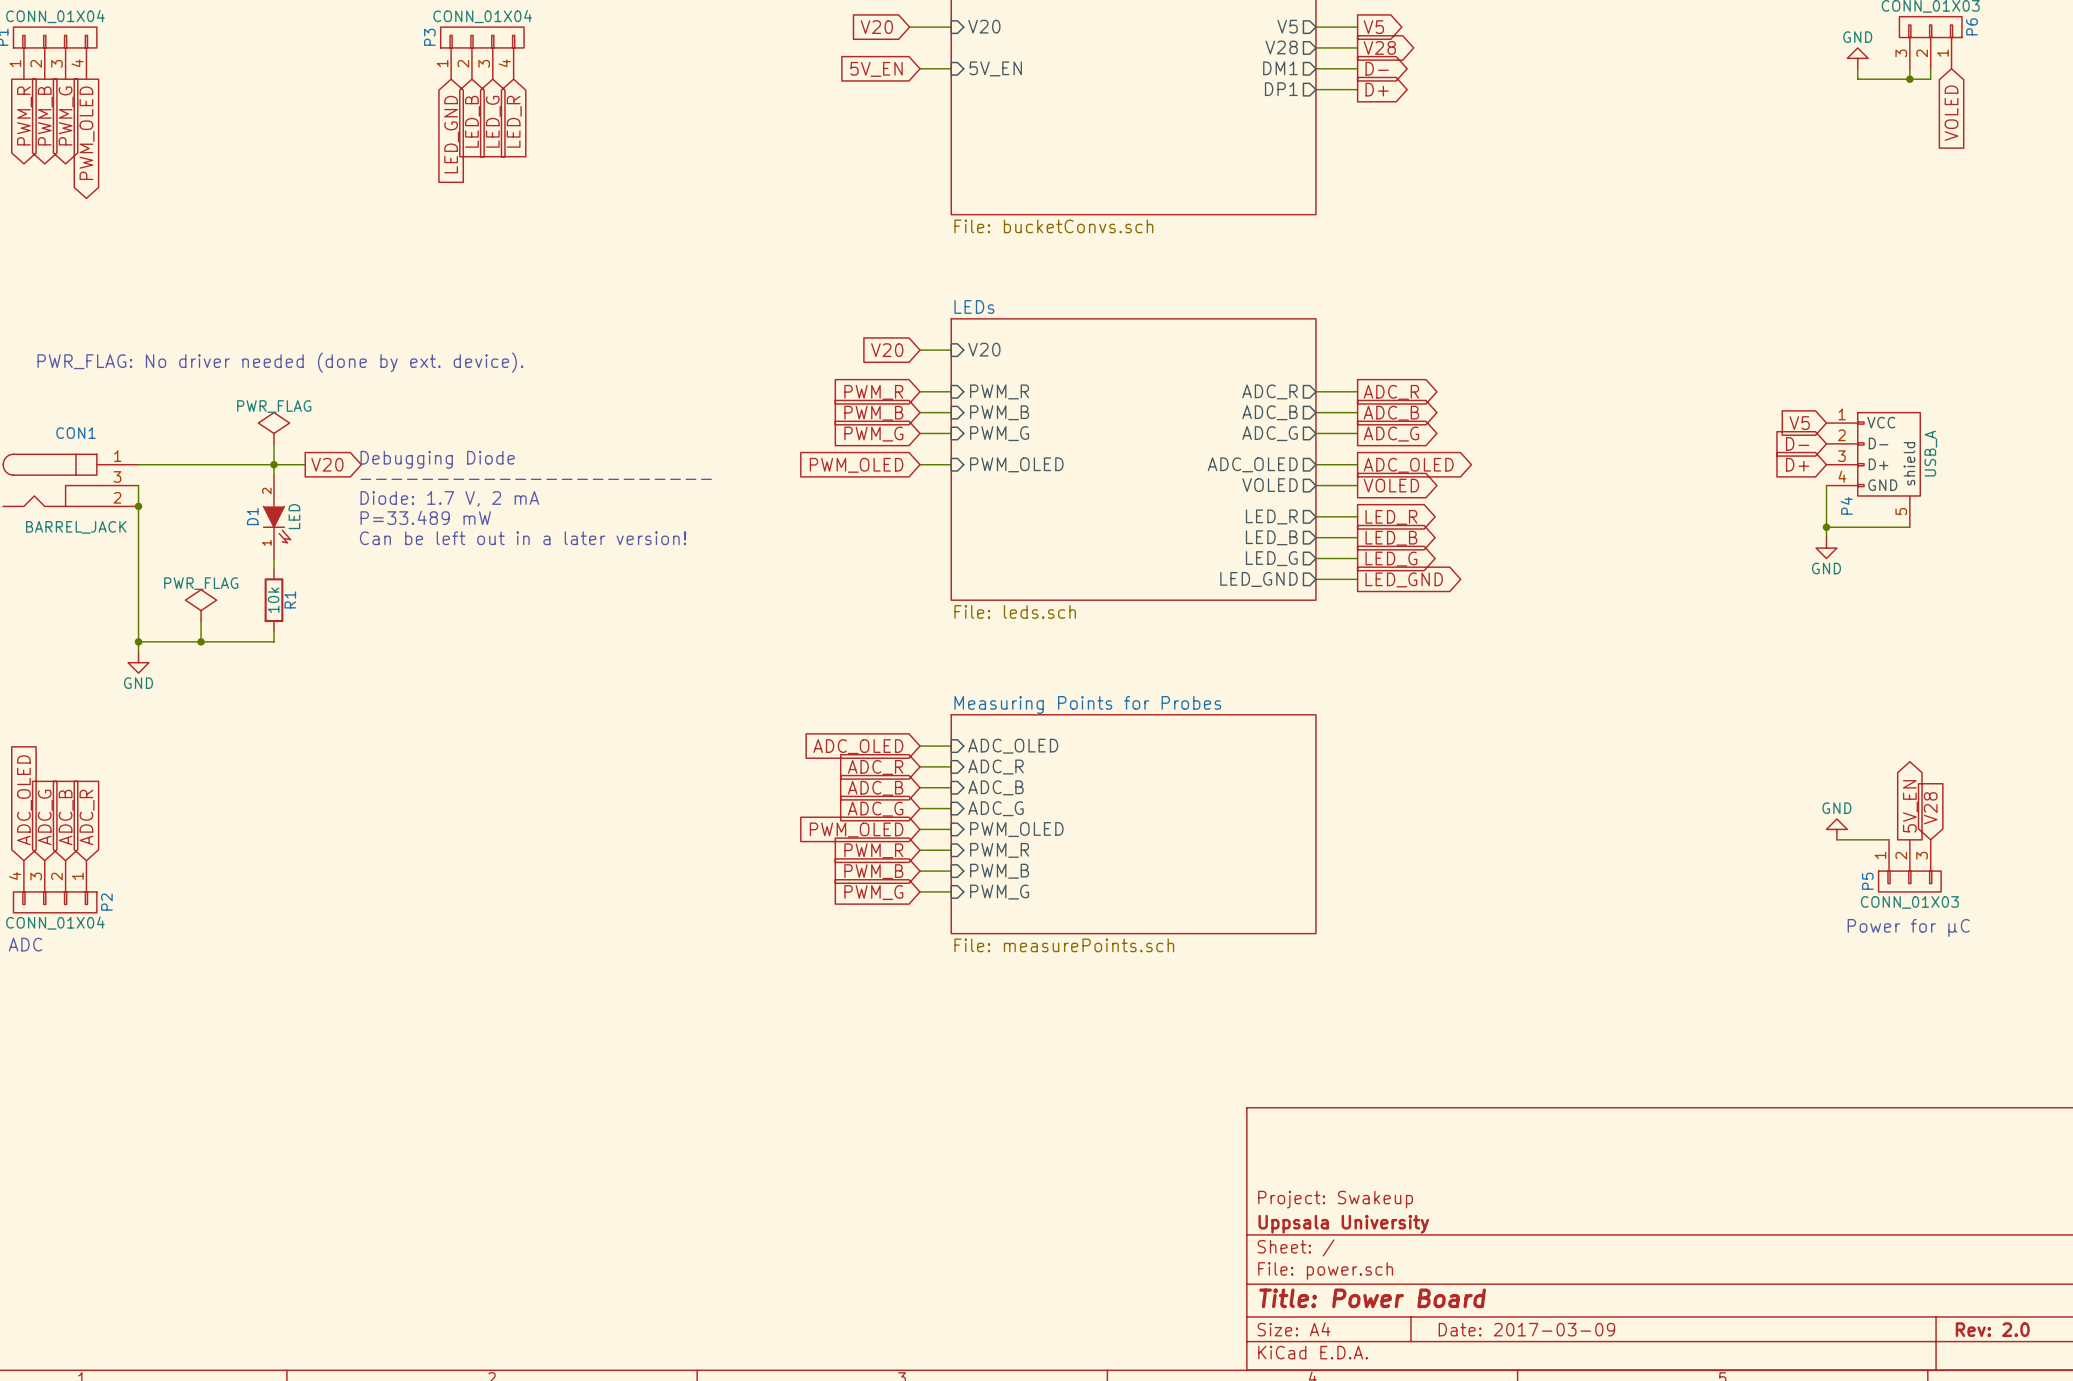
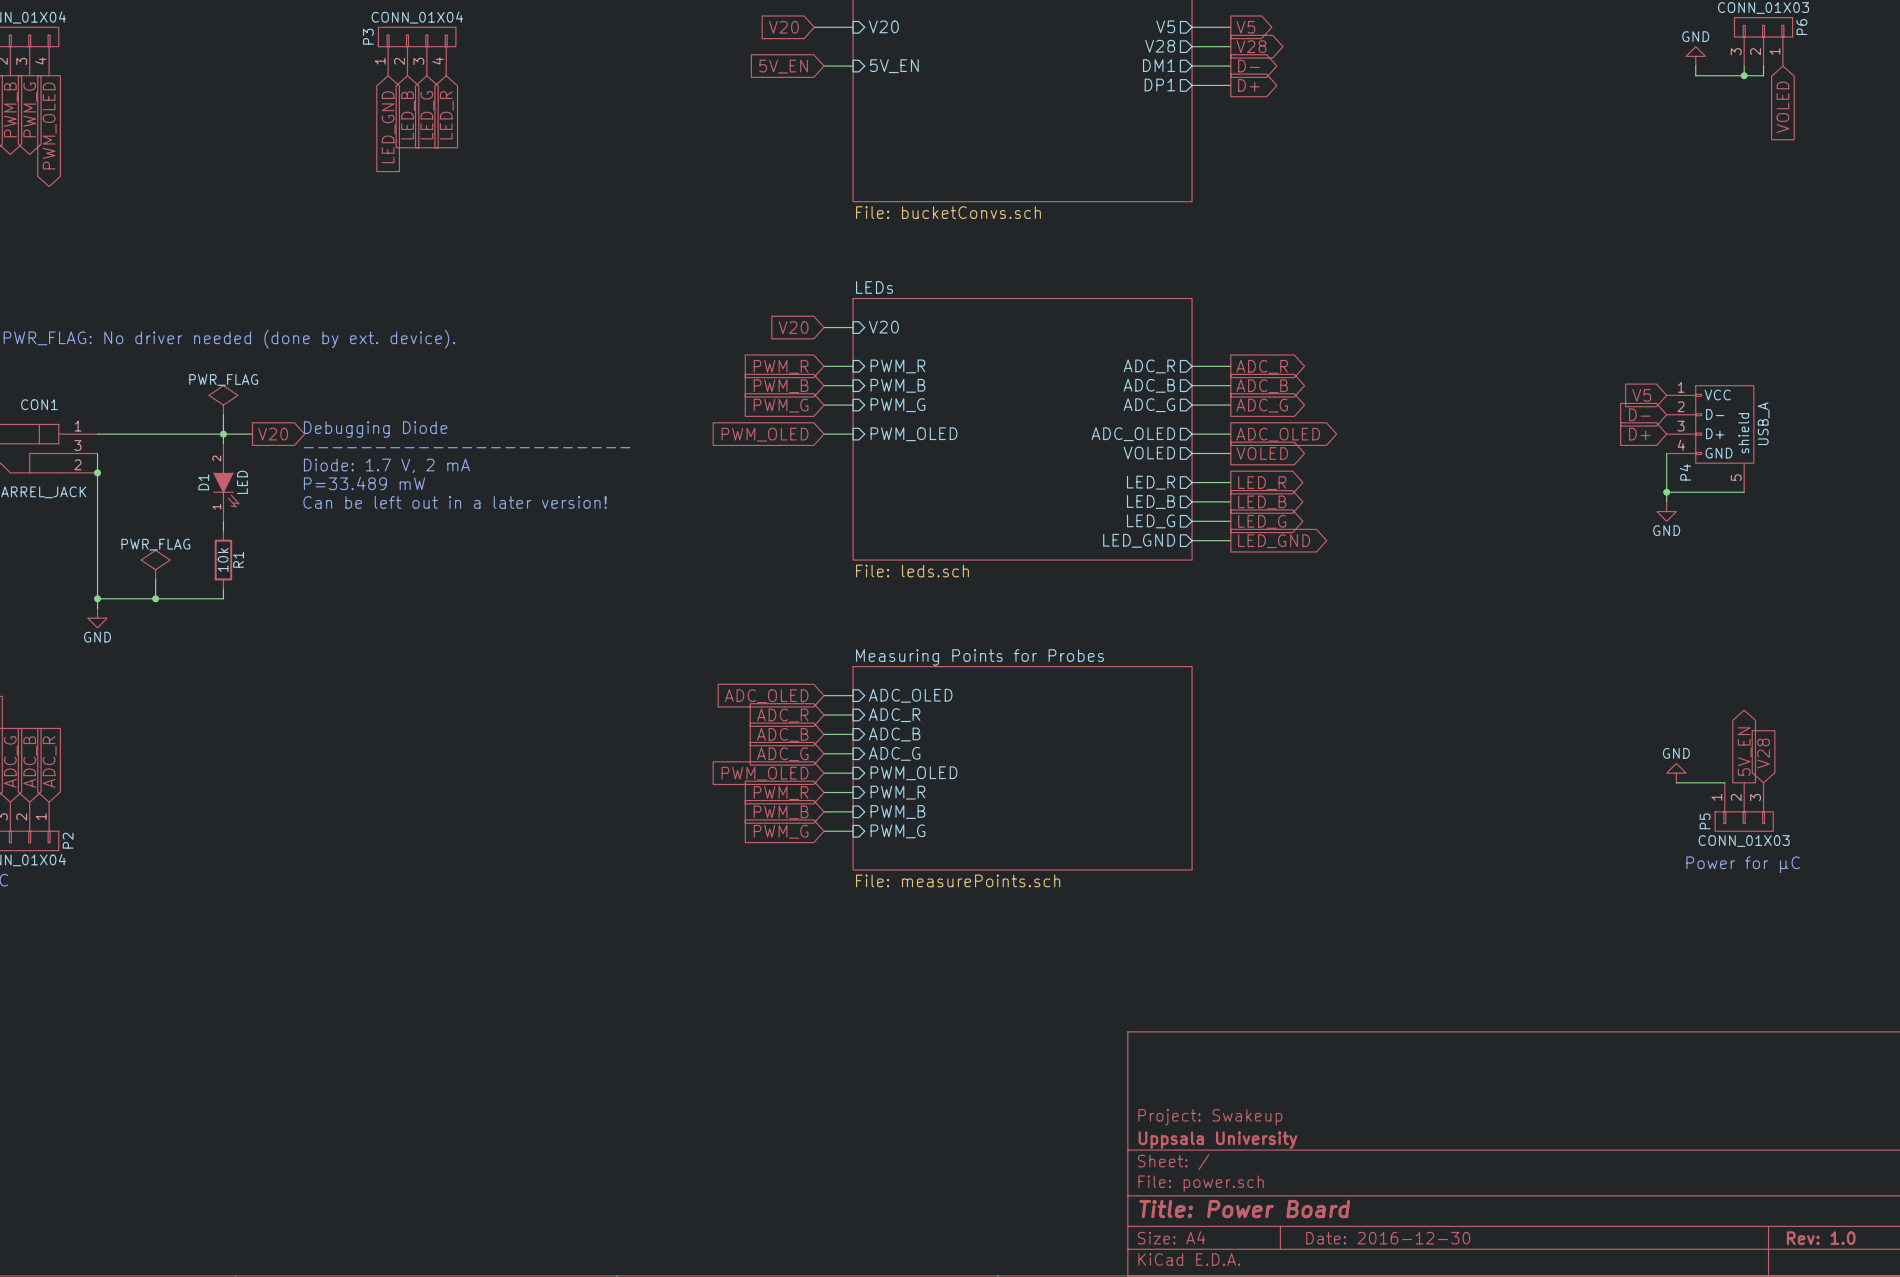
title block: Date: 2017-03-09 (1526, 1329) -> Date: 2016-12-30 (1388, 1238)
title block: Rev: 2.0 (1992, 1329) -> Rev: 1.0 (1821, 1238)

